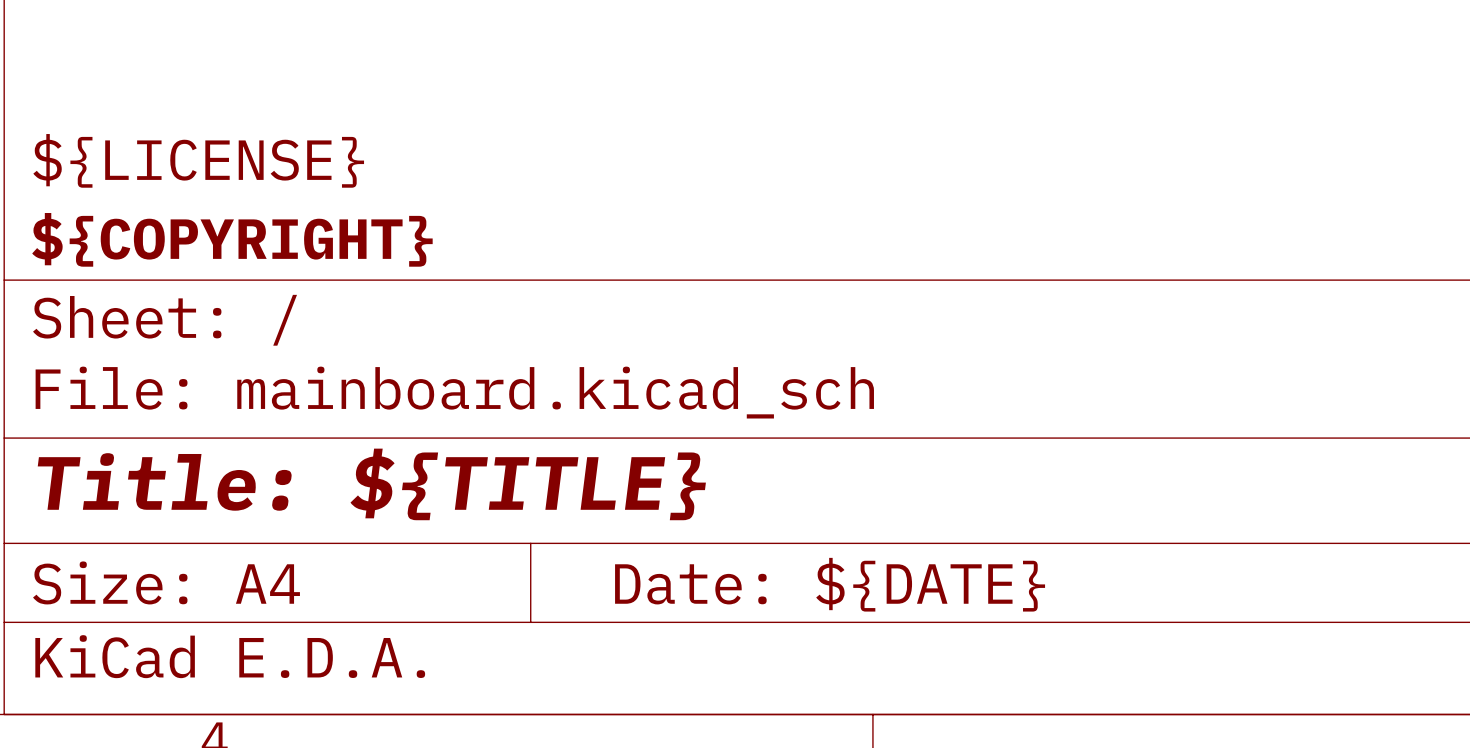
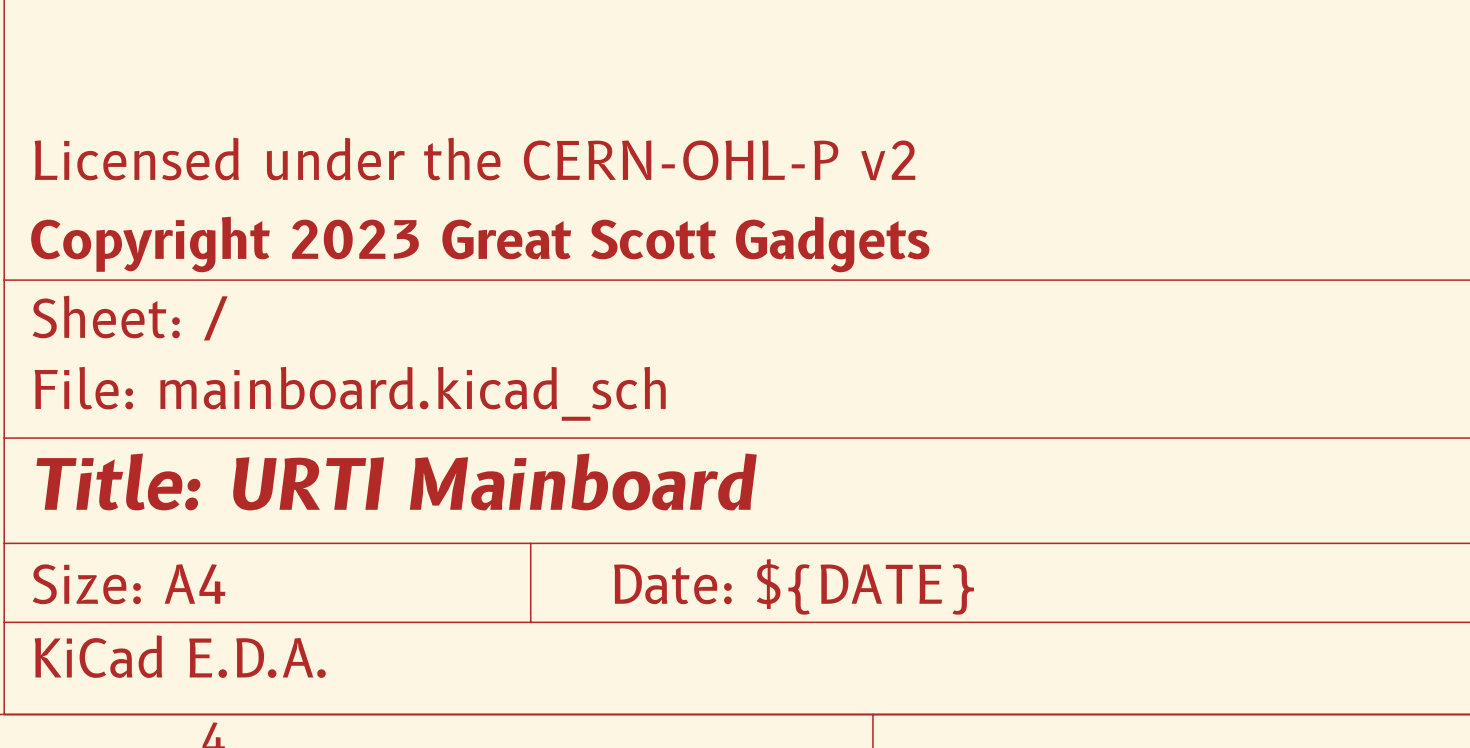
title block: ${LICENSE} (198, 160) -> Licensed under the CERN-OHL-P v2 (474, 159)
title block: ${COPYRIGHT} (232, 239) -> Copyright 2023 Great Scott Gadgets (480, 244)
title block: Title: ${TITLE} (371, 484) -> Title: URTI Mainboard (396, 481)

